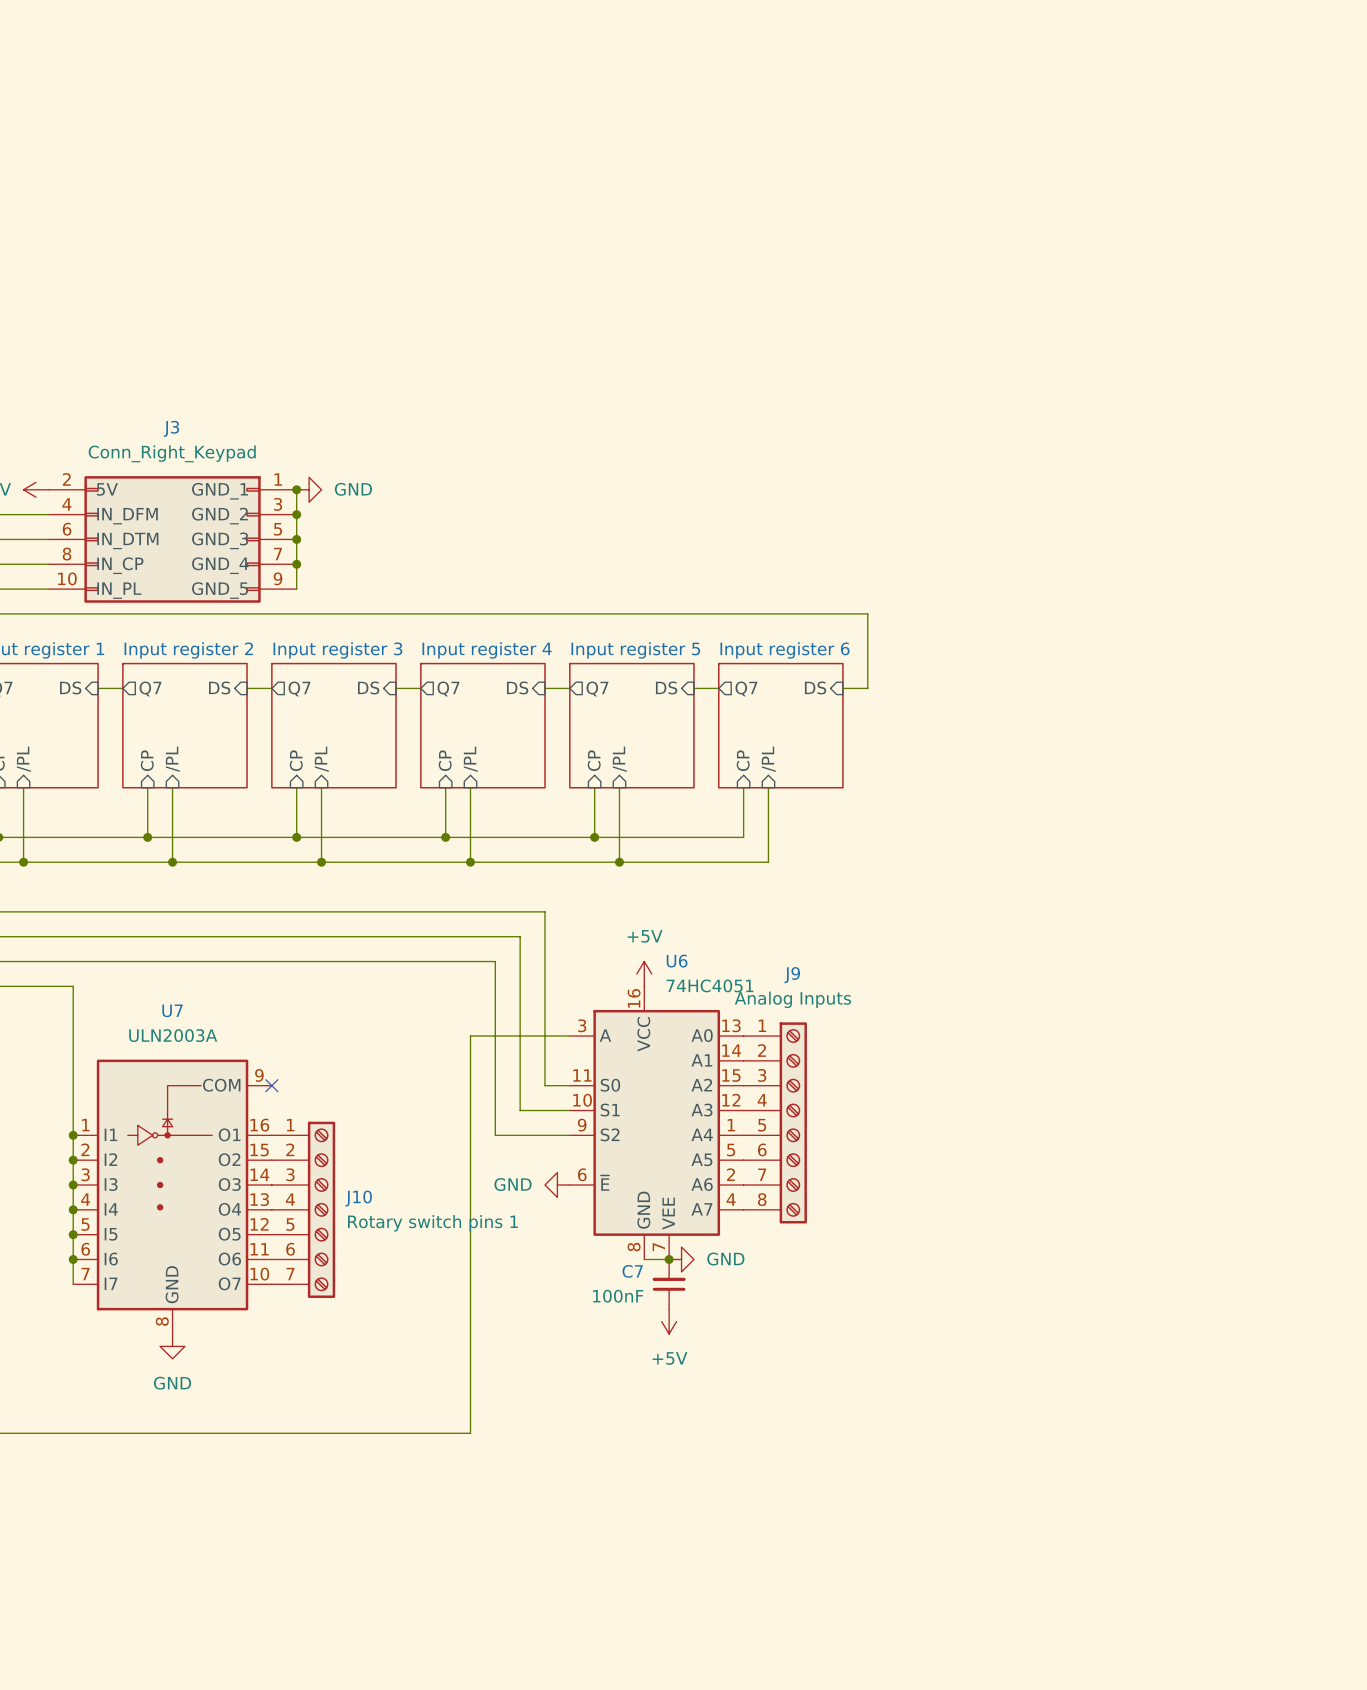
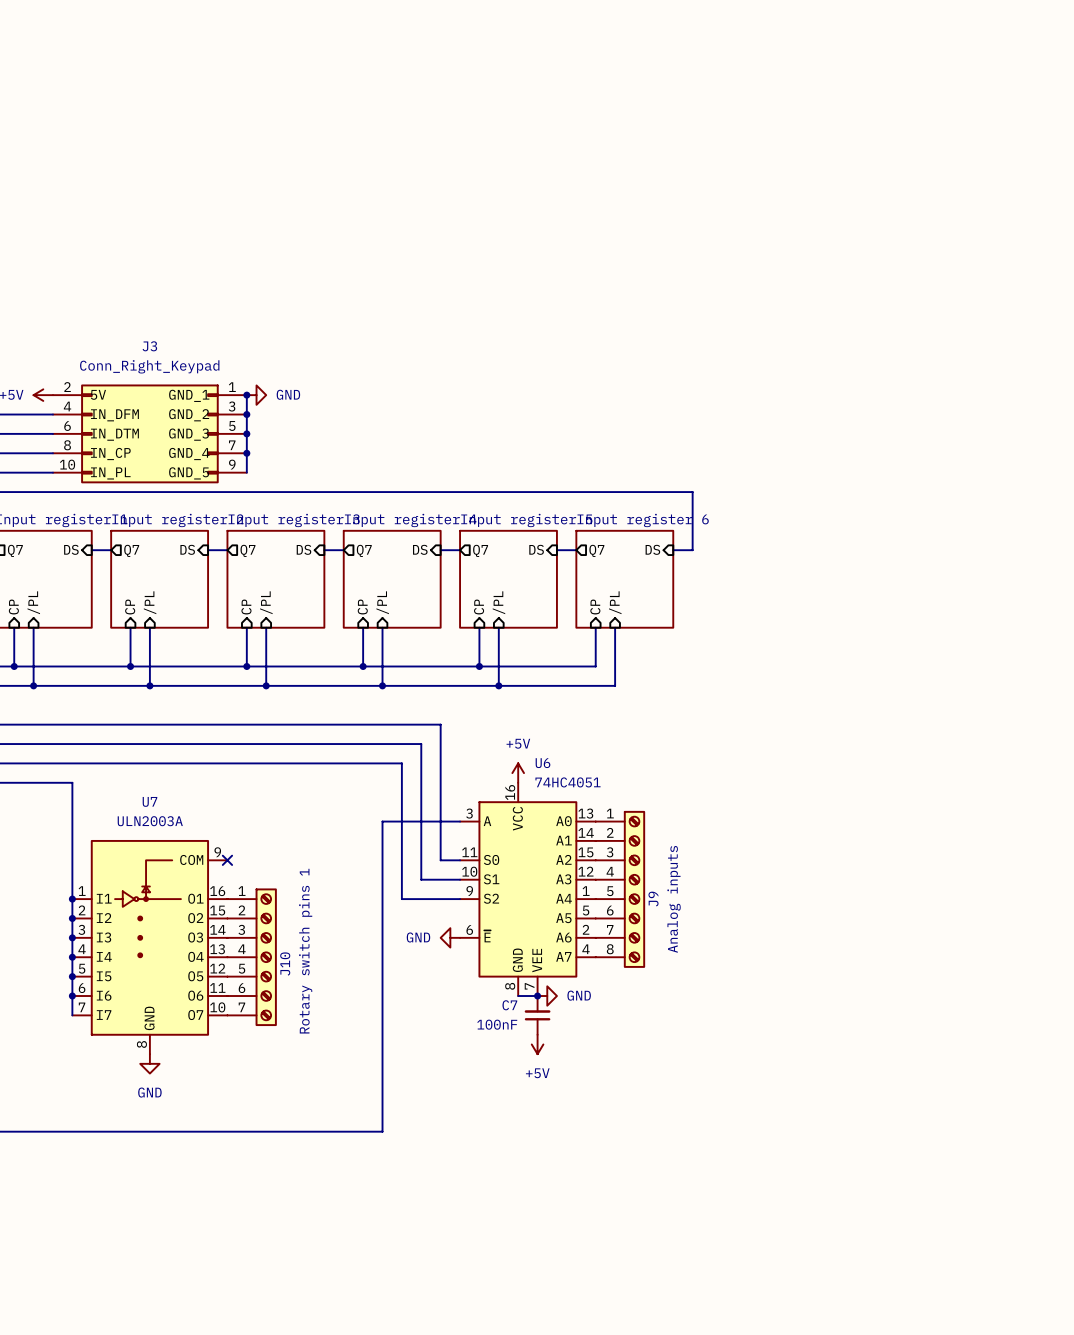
J9 name rotation: 0° (792, 975) -> 90° counterclockwise (653, 899)
J9 name position: J9 (792, 975) -> J9 (653, 899)
J9 value: Analog Inputs (792, 999) -> Analog inputs (674, 899)
J10 name rotation: 0° (358, 1198) -> 90° counterclockwise (285, 964)
J10 value rotation: 0° (432, 1223) -> 90° counterclockwise (305, 951)

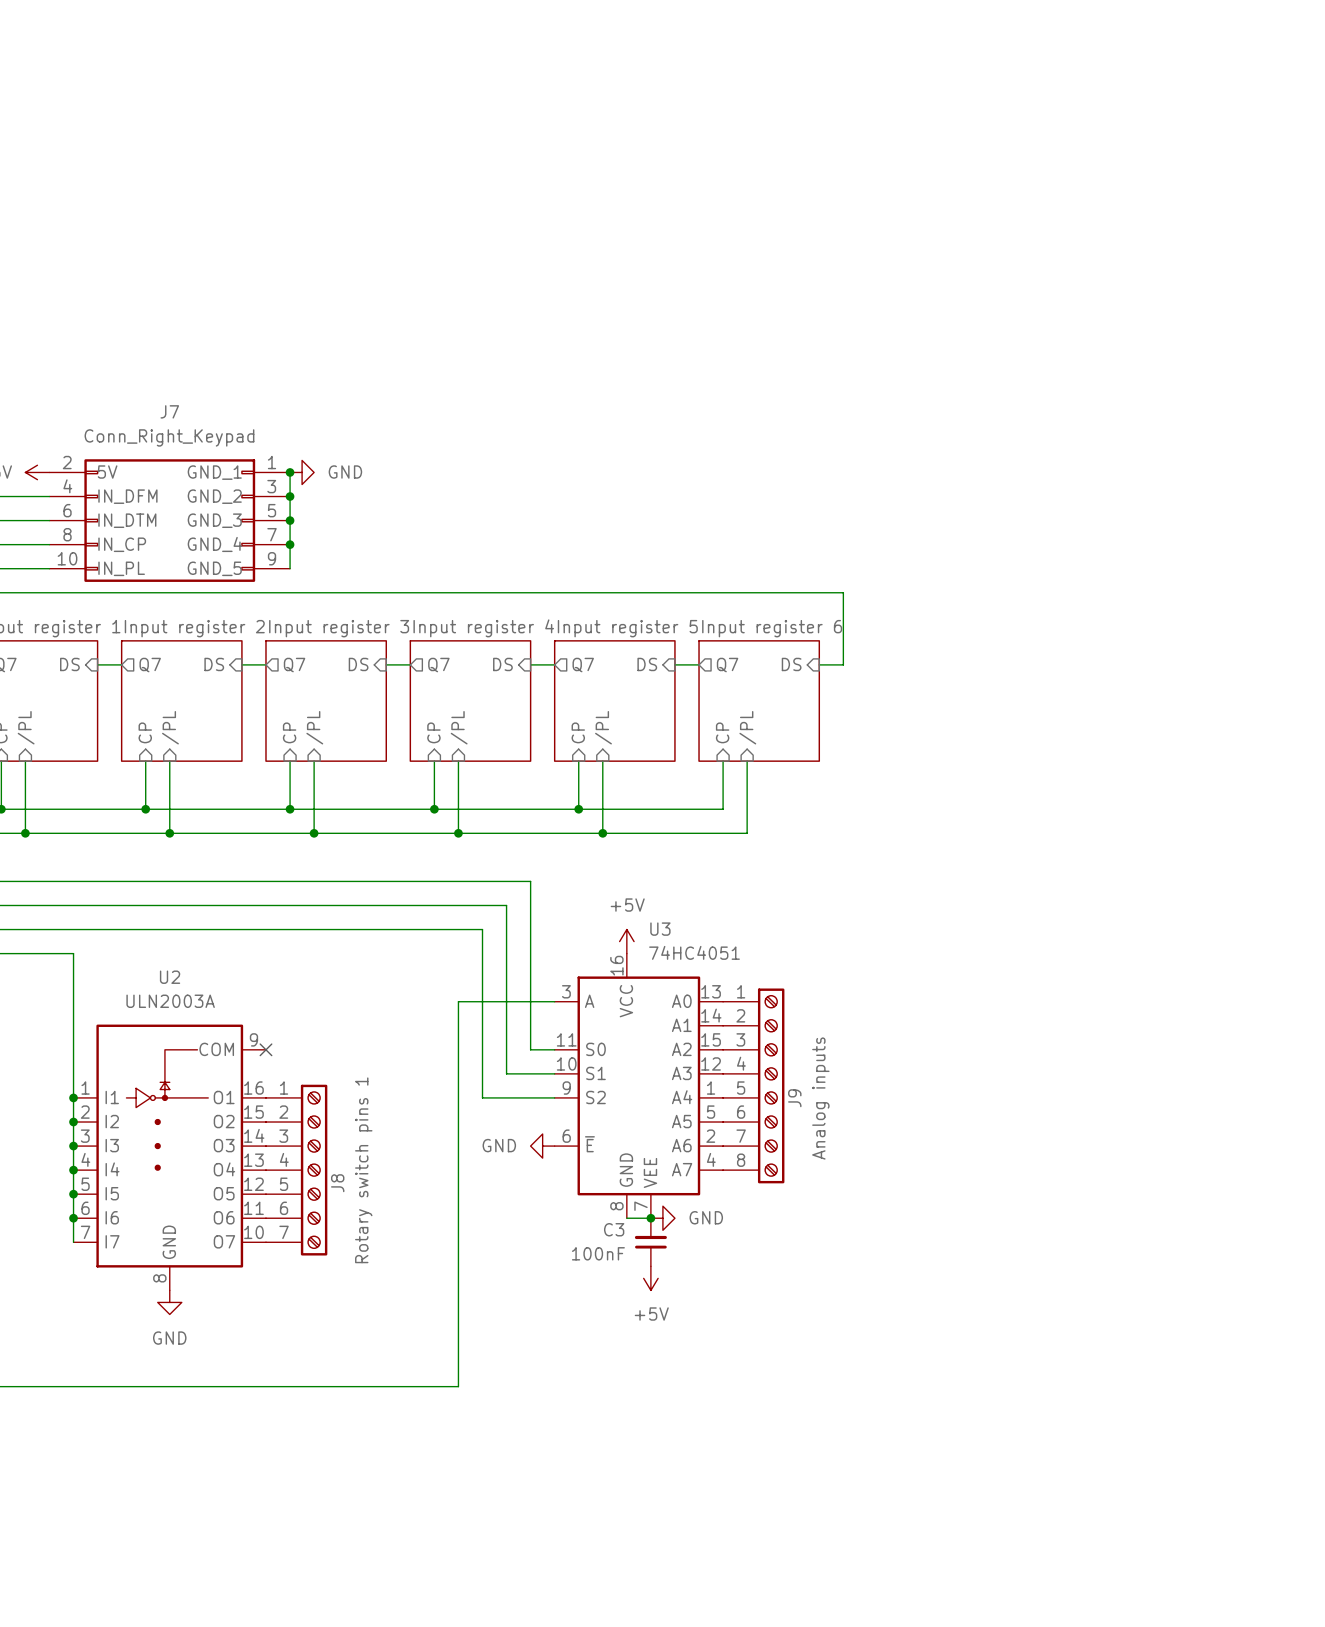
J3 name: J3 (149, 346) -> J7 (169, 411)
U6 name: U6 (542, 763) -> U3 (660, 929)
U7 name: U7 (149, 801) -> U2 (170, 977)
J10 name: J10 (285, 964) -> J8 (337, 1183)
C7 name: C7 (509, 1005) -> C3 (614, 1229)

